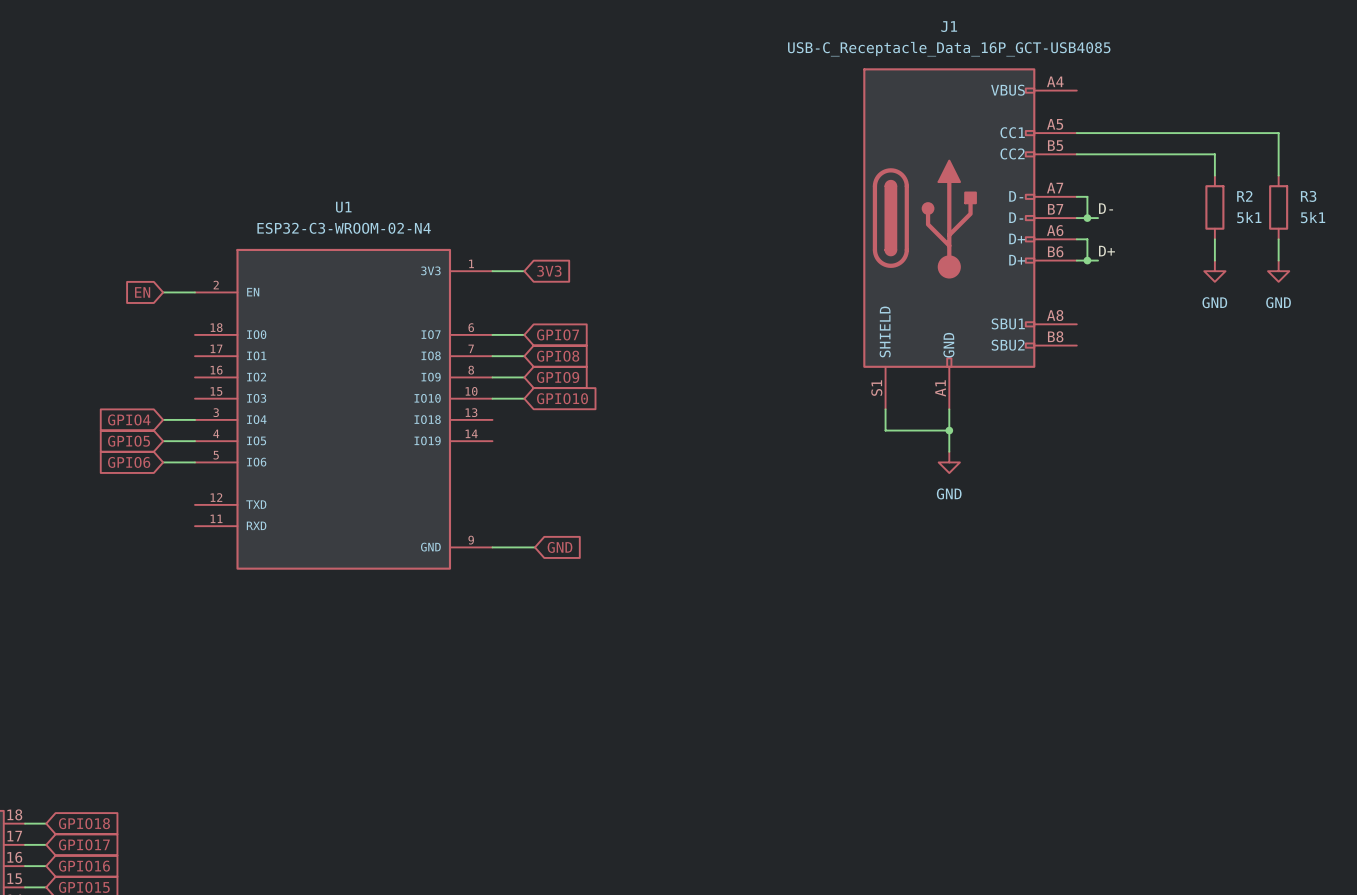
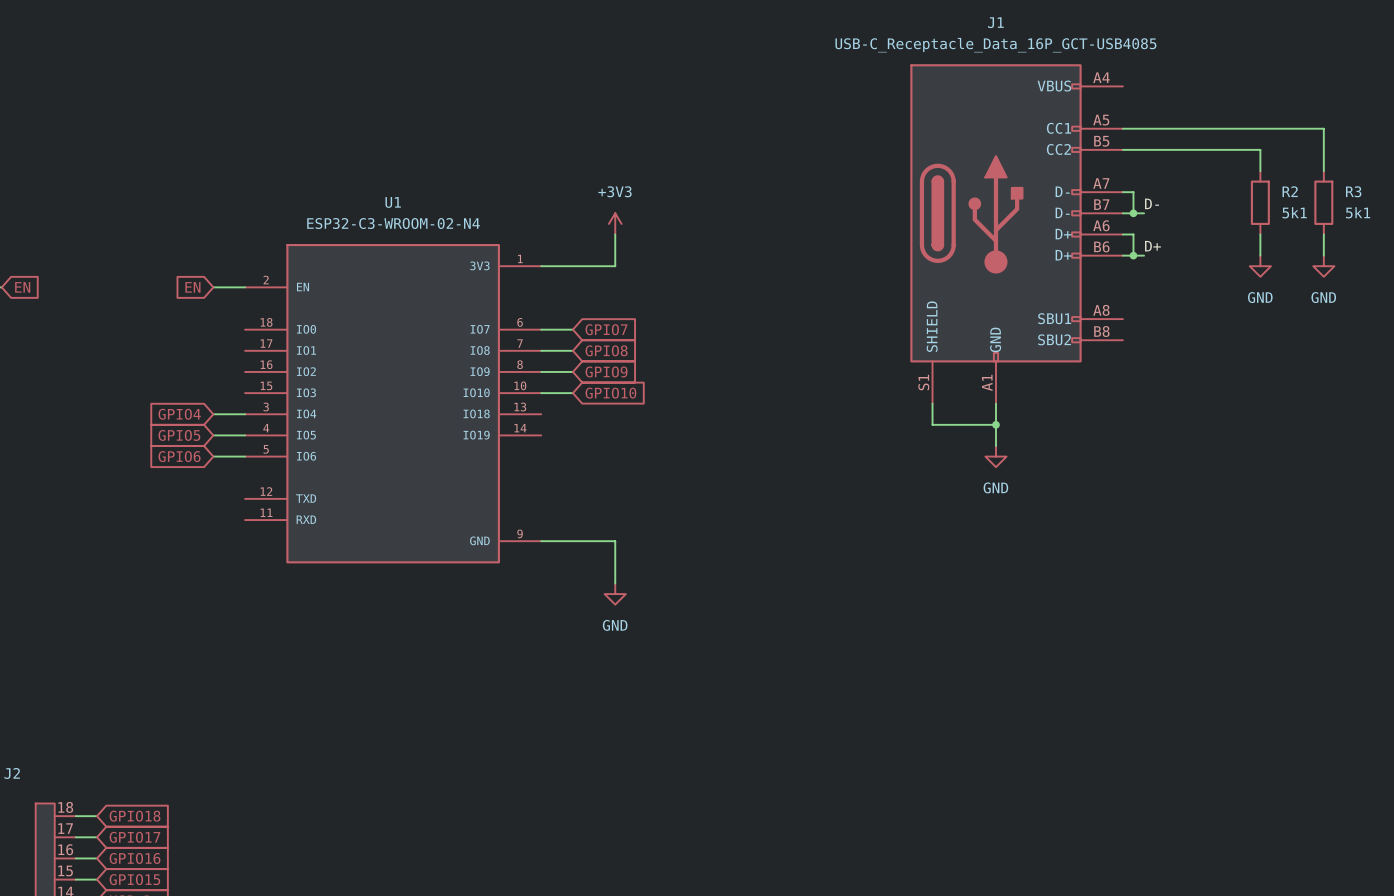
power symbol: none -> +3V3 (615, 223)
wire: none -> (615, 234) (615, 266) (572, 266)
global label: 3V3 (549, 271) -> none
wire: none -> (583, 541) (615, 541) (615, 583)
global label: GND (559, 547) -> none
power symbol: none -> GND (615, 594)

